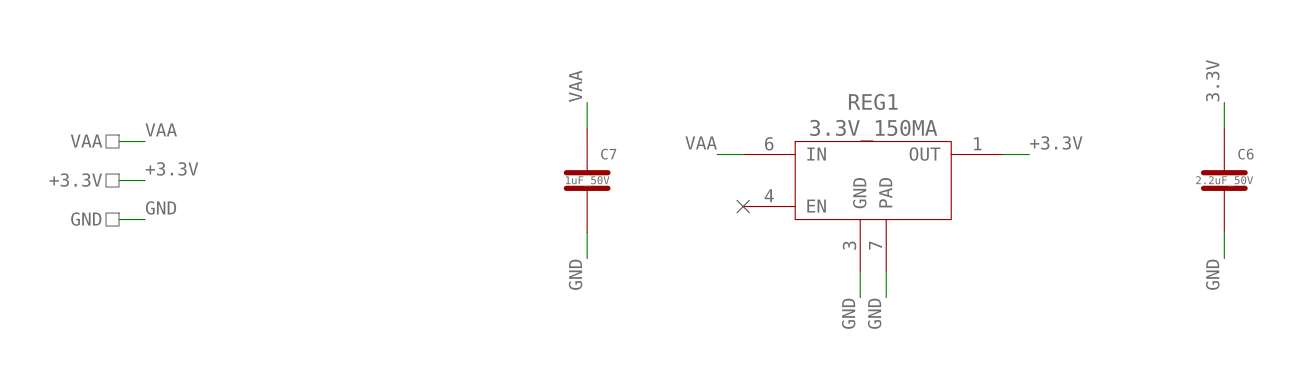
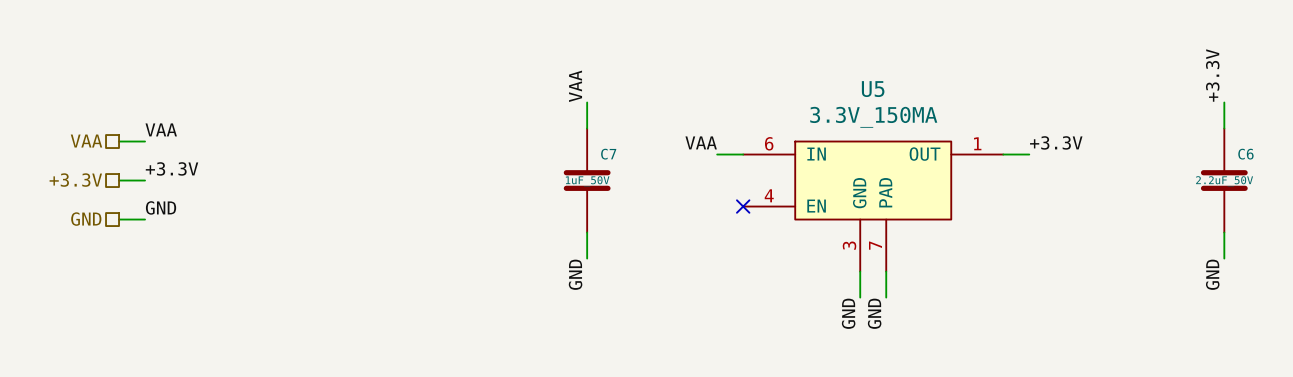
label: 3.3V (1212, 80) -> +3.3V (1212, 75)
REG1: 3.3V_150MA (873, 206) -> none
U5: none -> 3.3V_150MA (873, 206)

